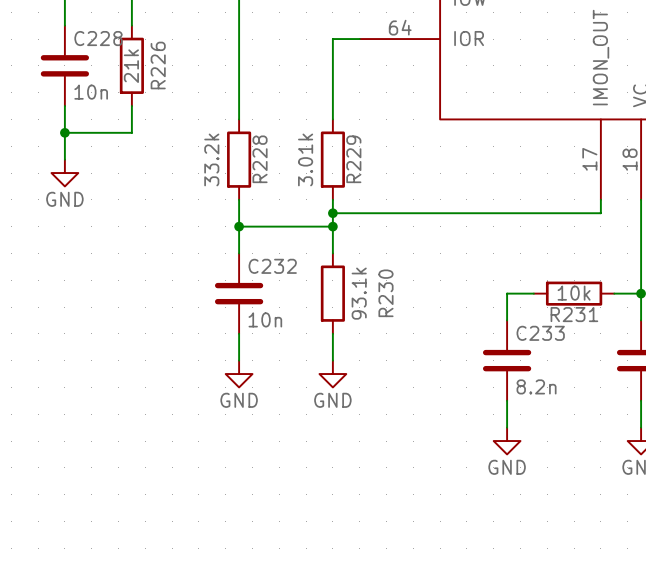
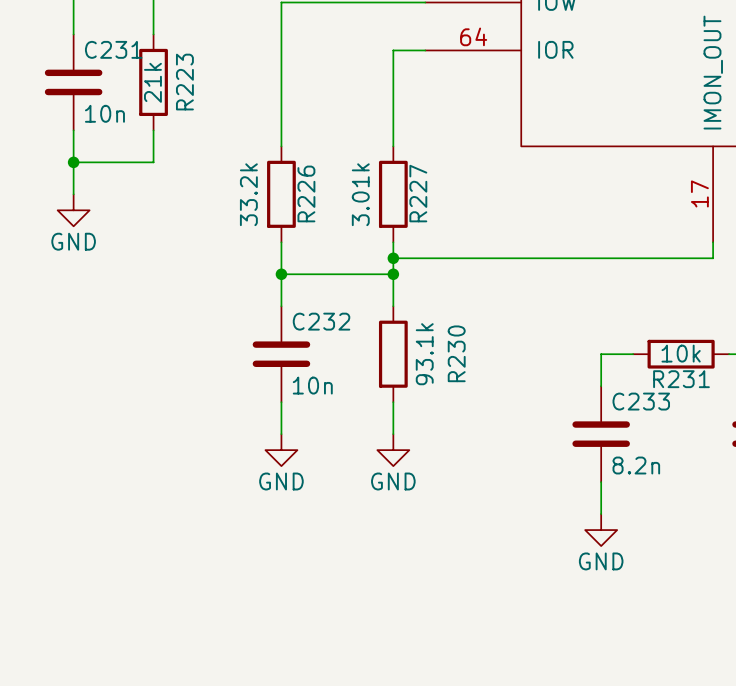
C228 name: C228 (98, 38) -> C231 (113, 49)
R226 name: R226 (158, 65) -> R223 (184, 82)
R228 name: R228 (260, 159) -> R226 (306, 193)
R229 name: R229 (353, 159) -> R227 (418, 193)

